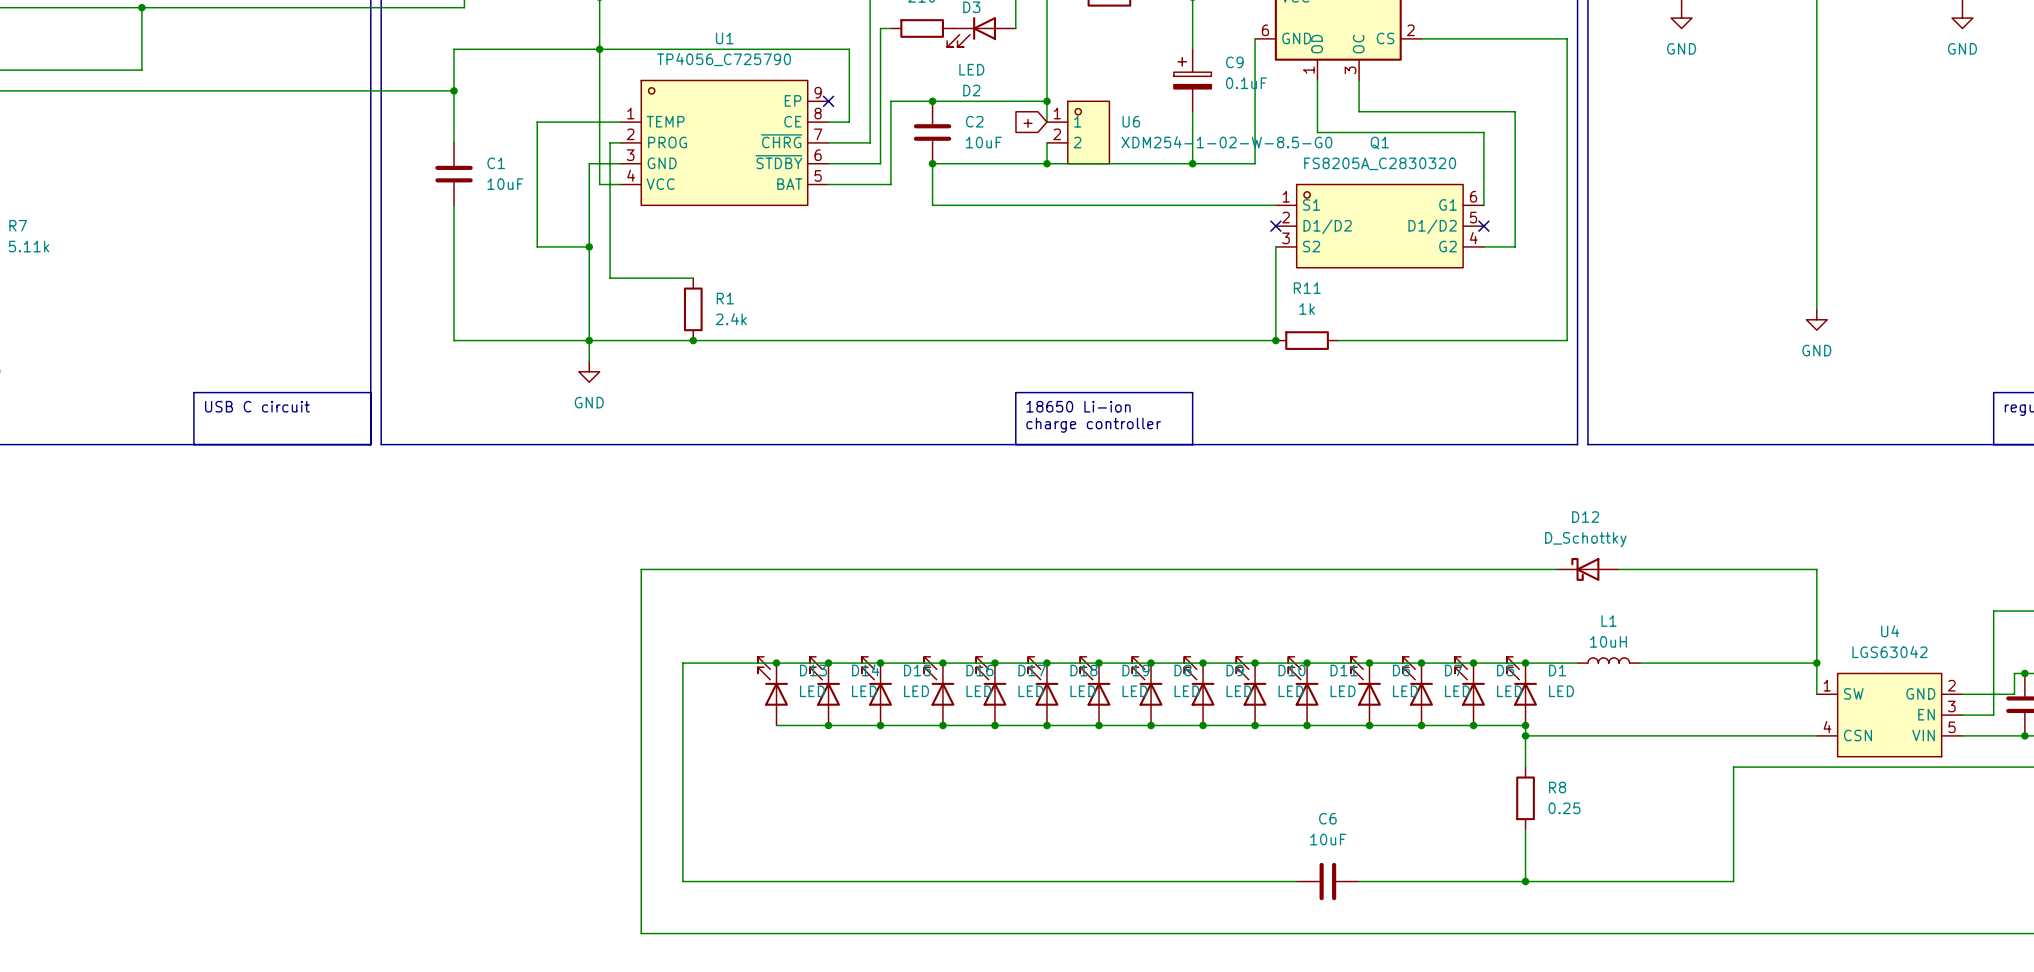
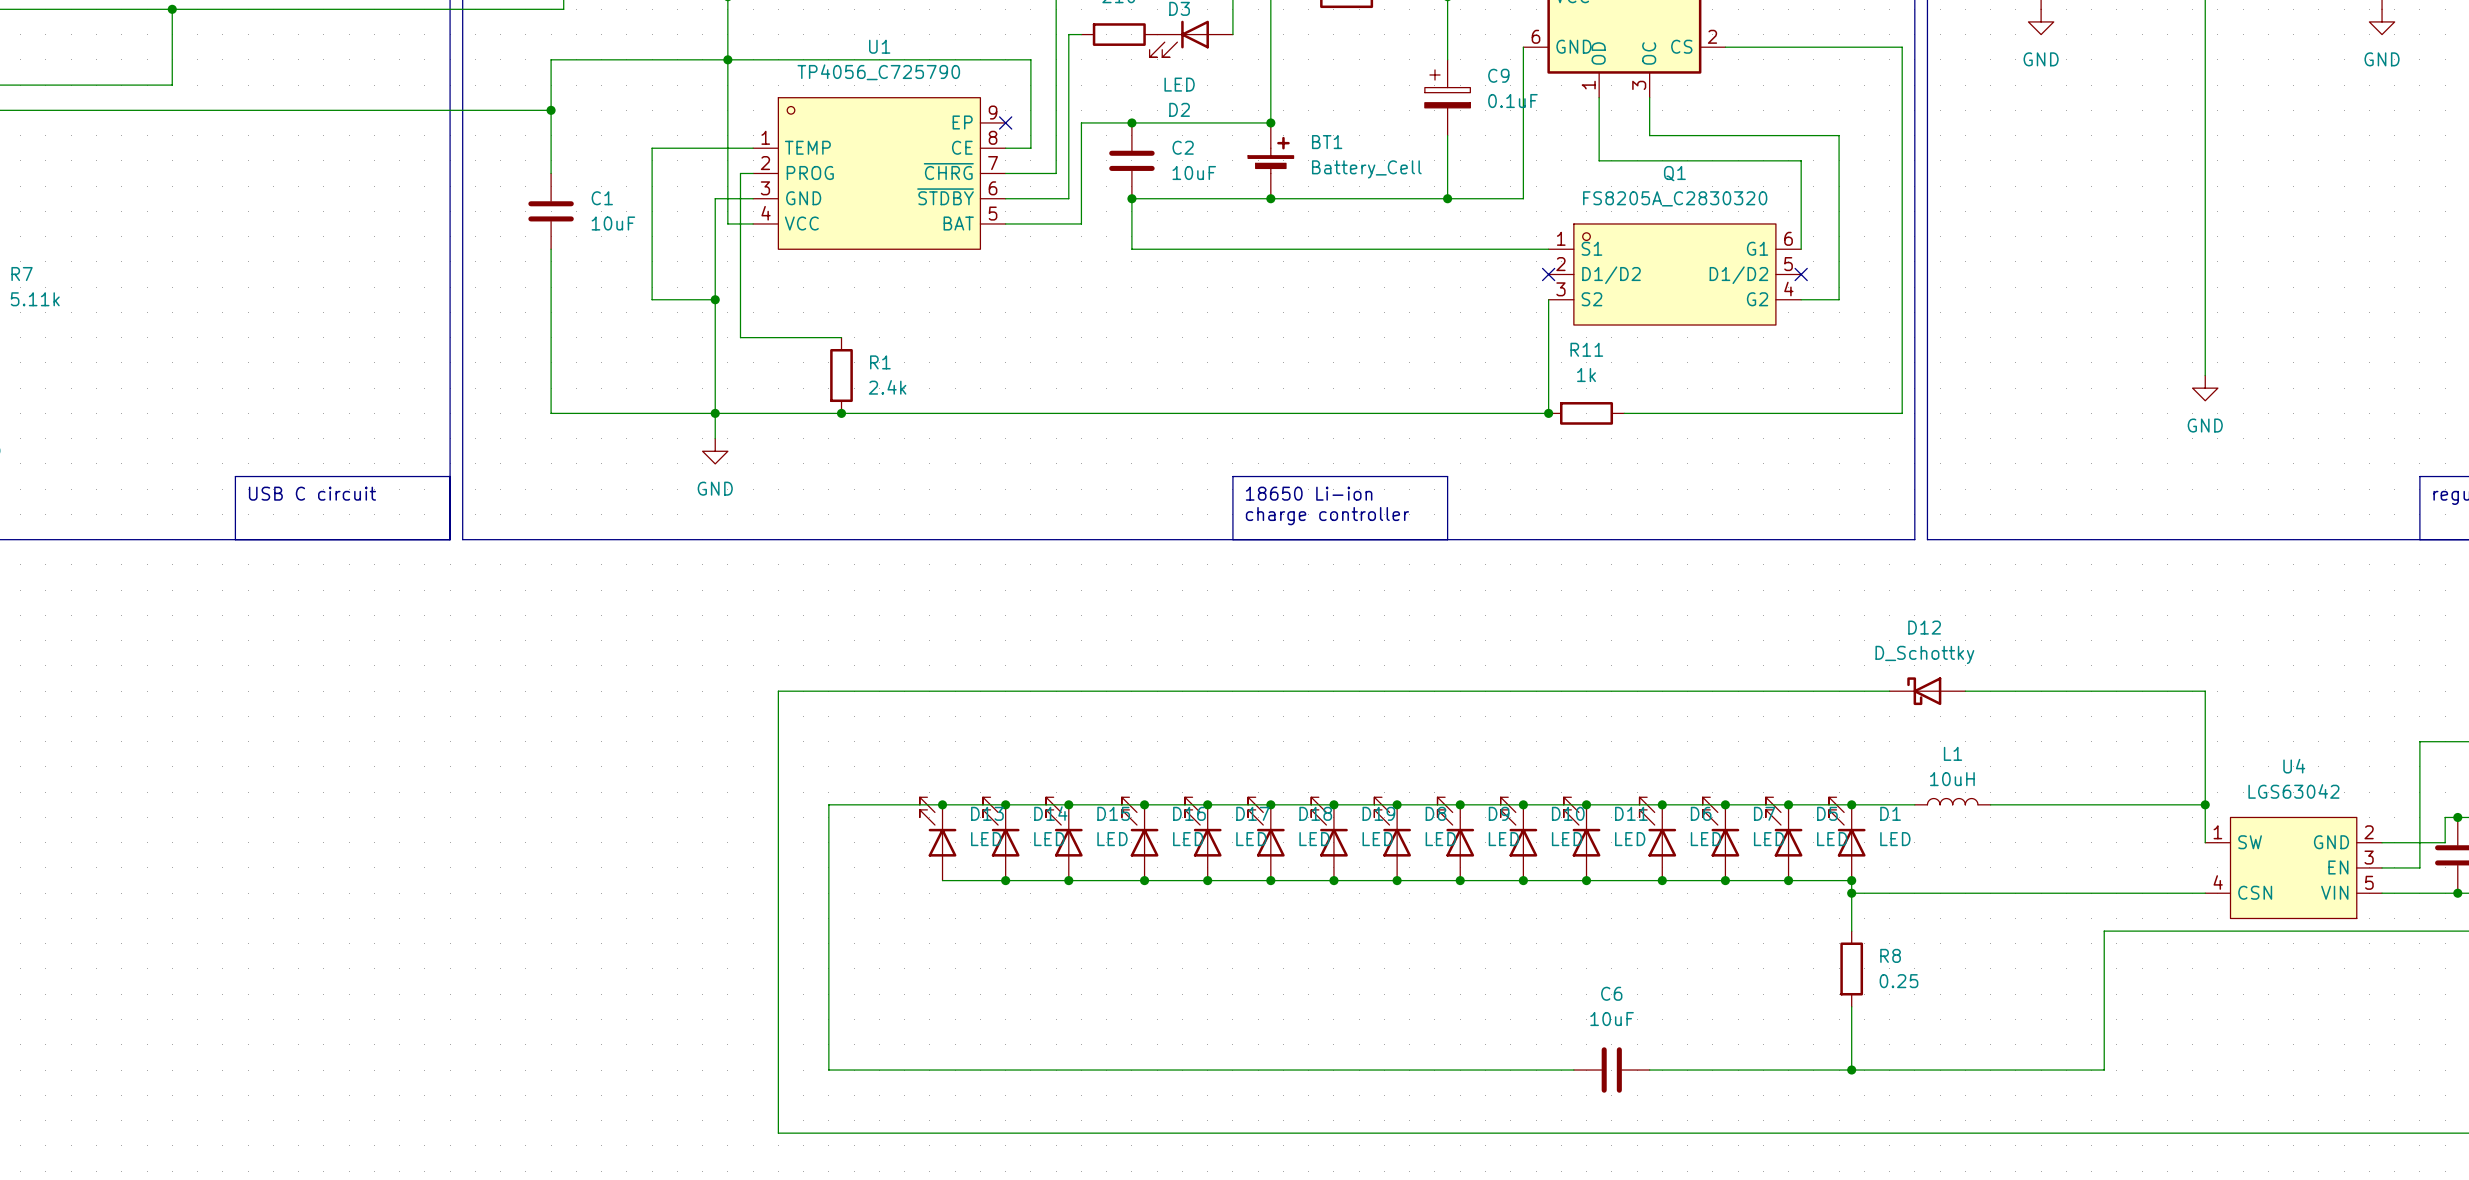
global label: + (1028, 123) -> none
BT1: none -> Battery_Cell (1270, 160)
U6: XDM254-1-02-W-8.5-G0 (1078, 132) -> none

